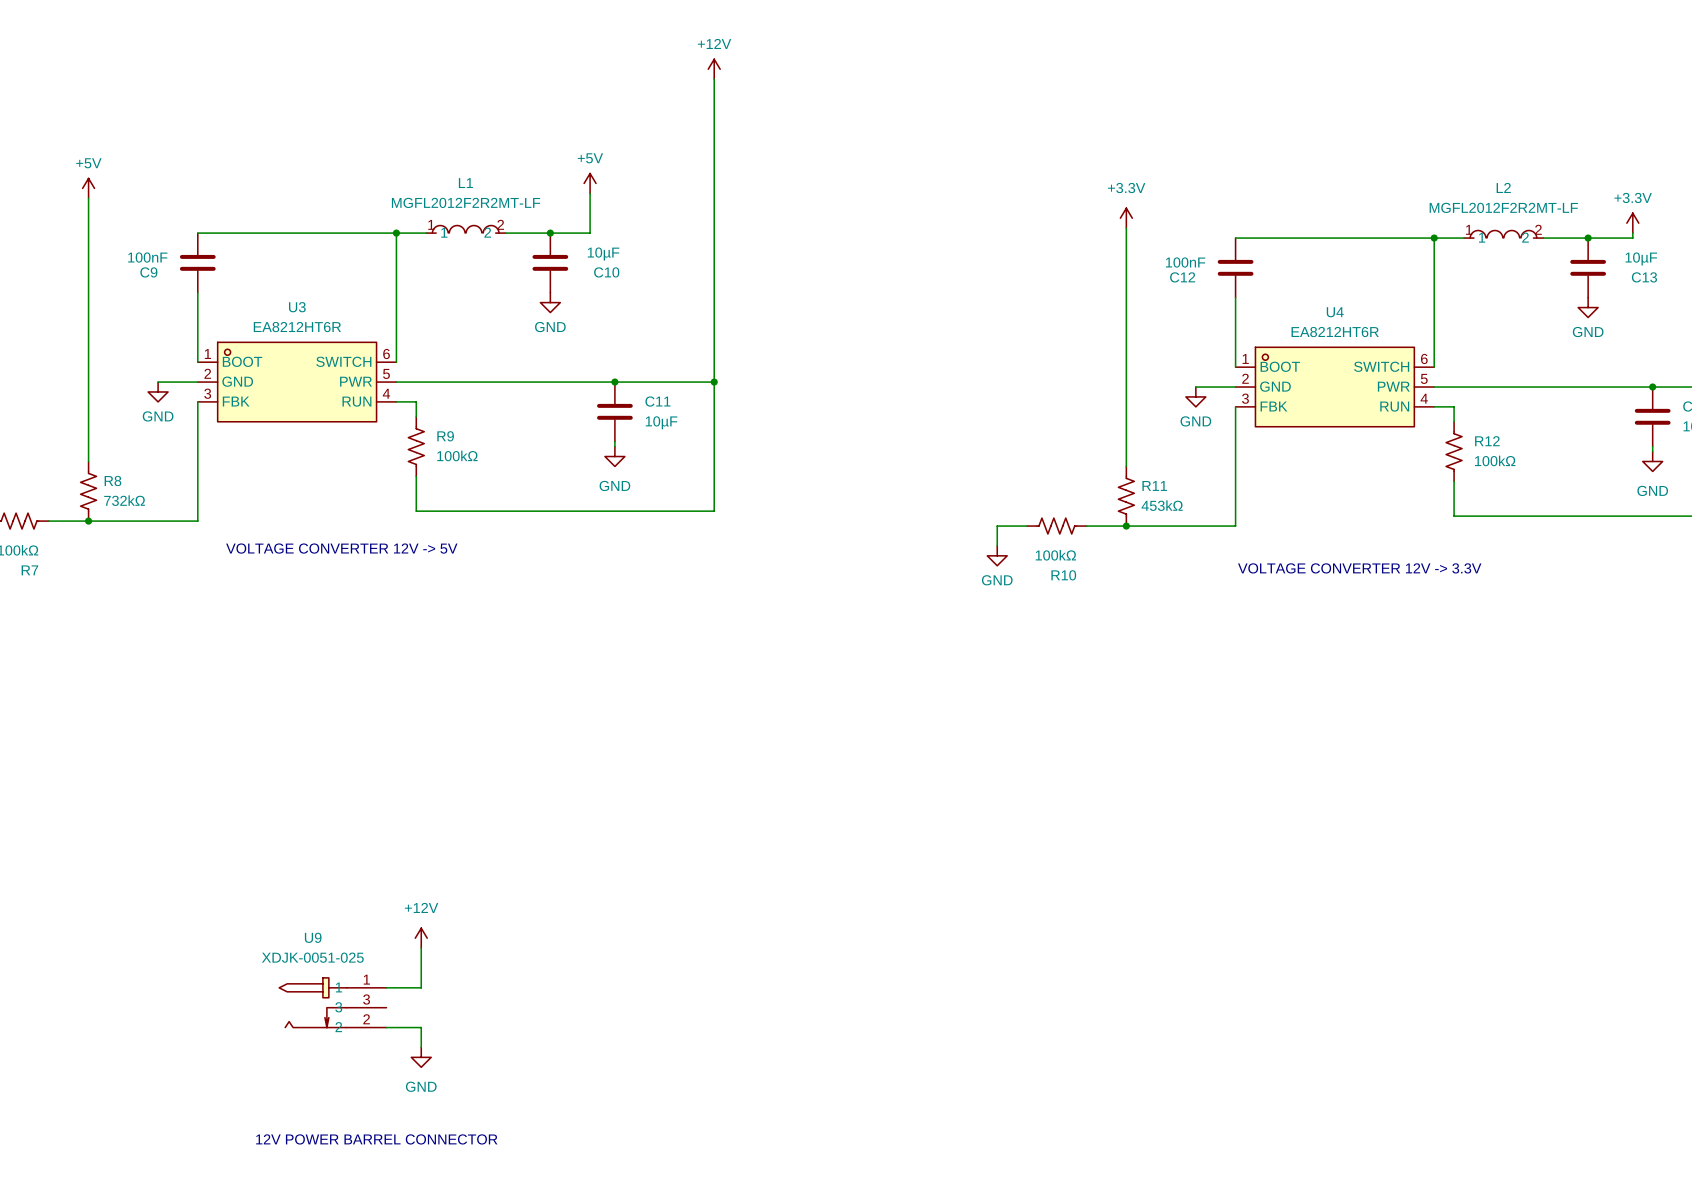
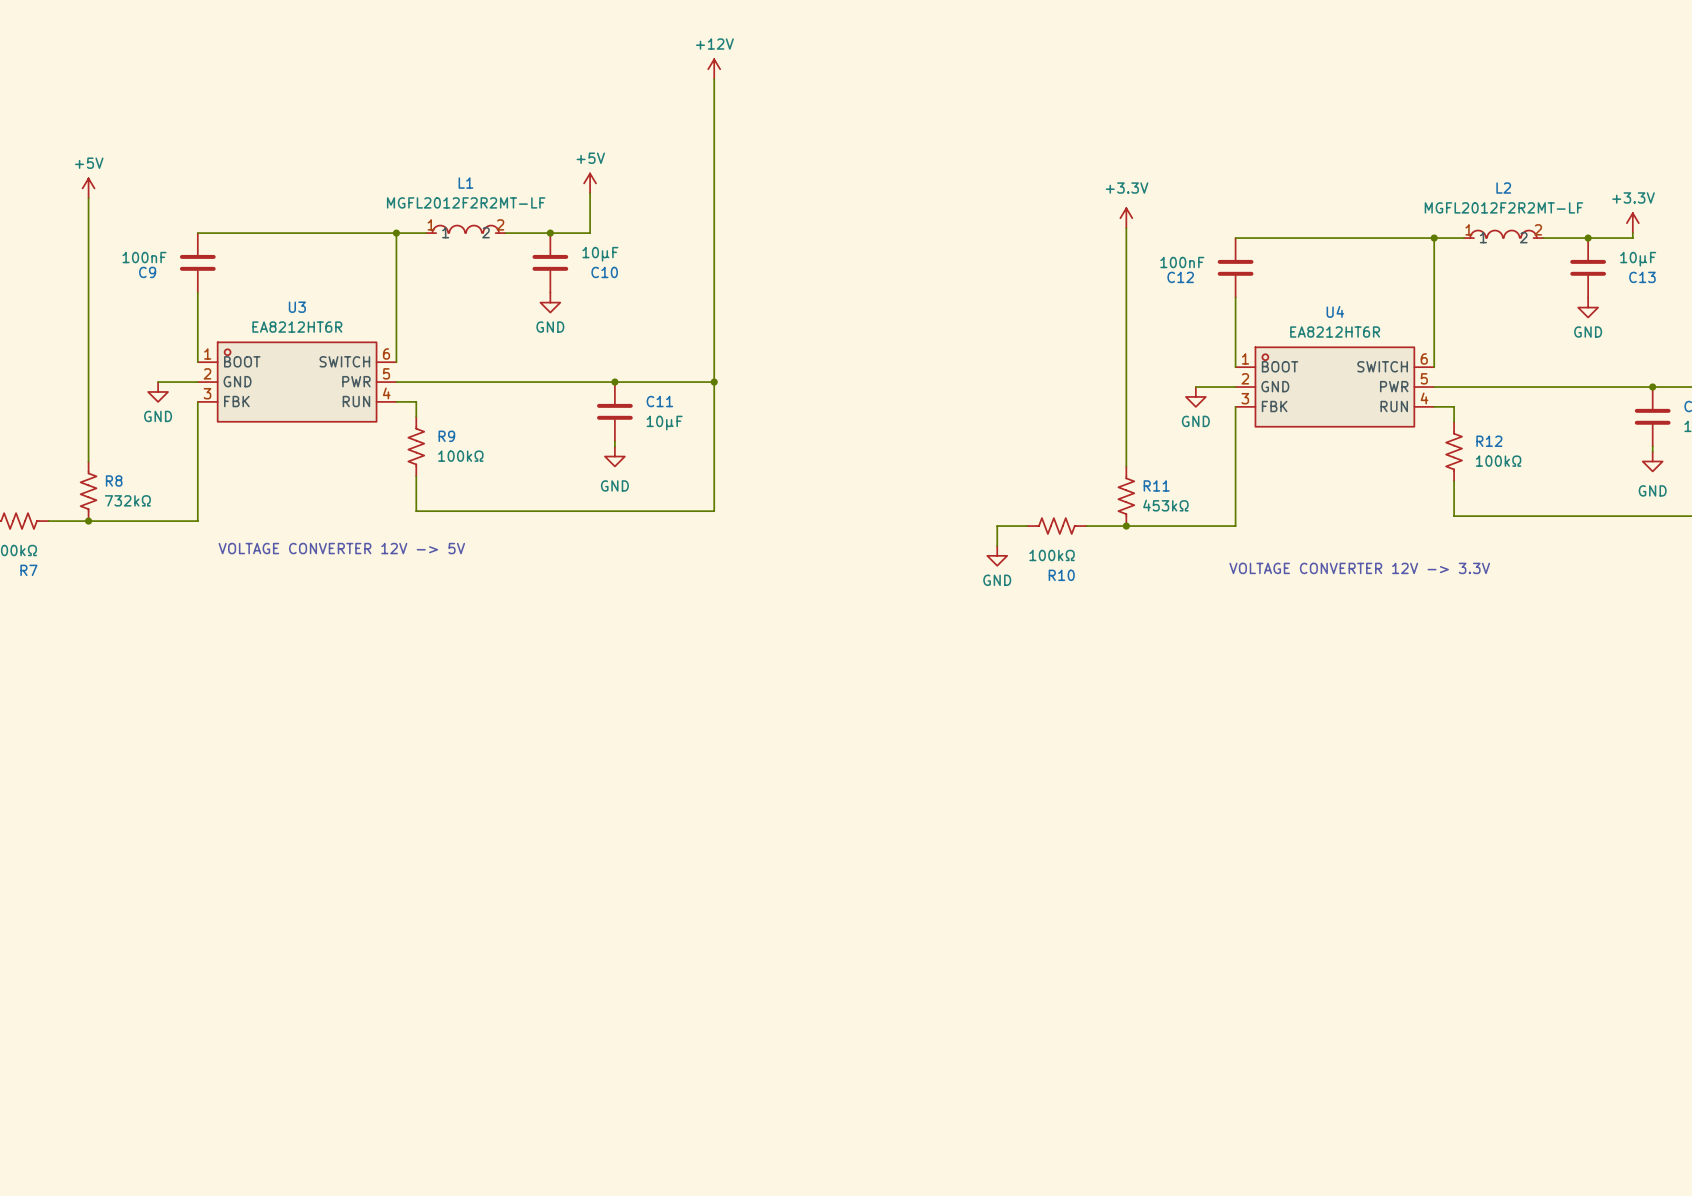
power symbol: +12V (421, 938) -> none
wire: (421, 948) (421, 987) (386, 987) -> none
U9: XDJK-0051-025 (332, 1002) -> none
wire: (386, 1027) (421, 1027) (421, 1047) -> none
power symbol: GND (421, 1057) -> none
text: 12V POWER BARREL CONNECTOR (376, 1139) -> none

